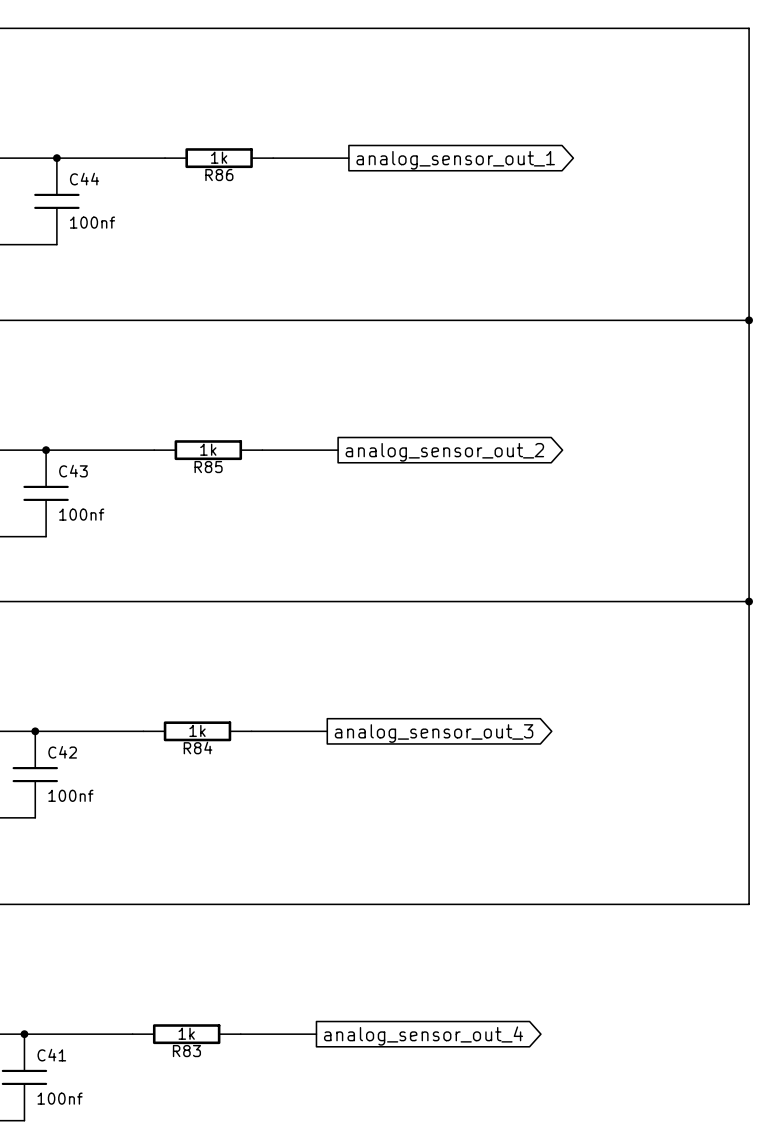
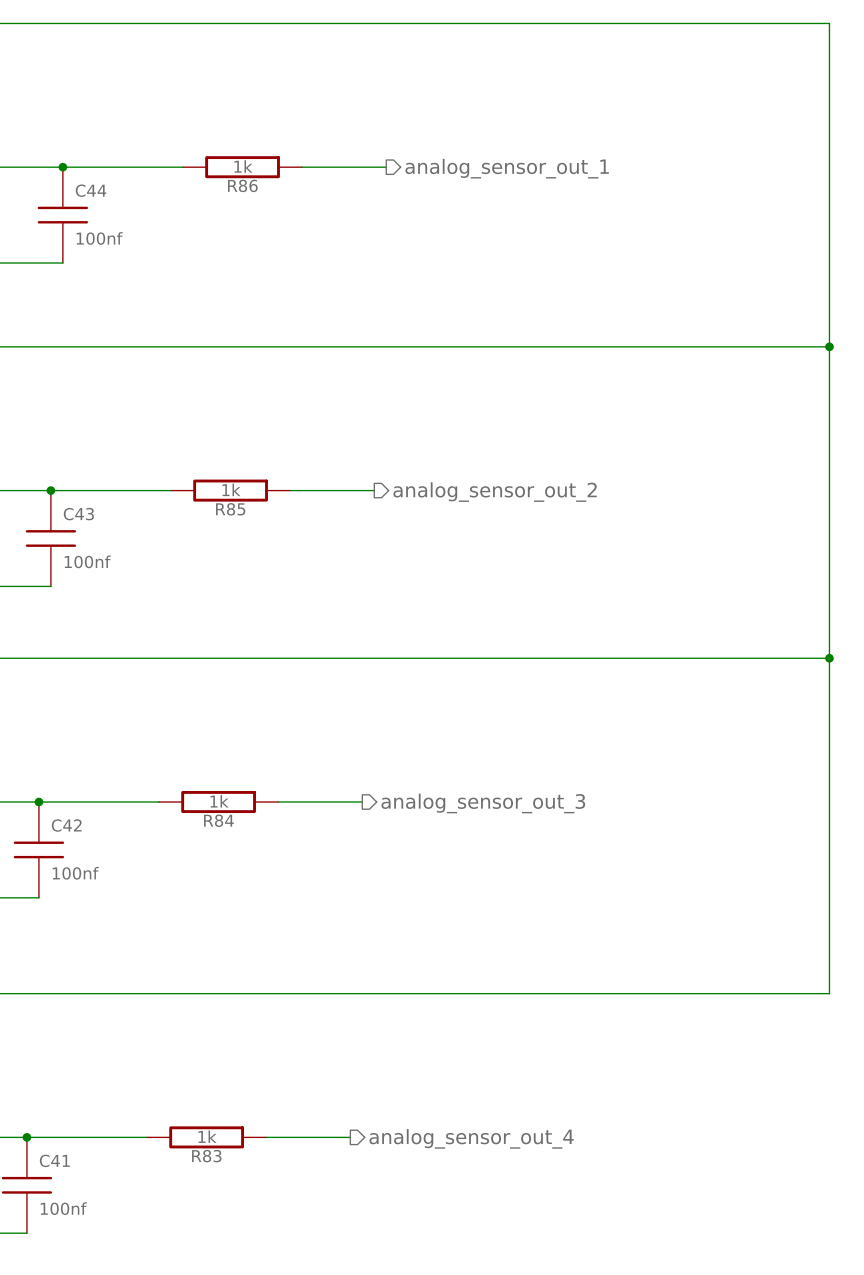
hierarchical label: none -> analog_sensor_out_1 (507, 168)
global label: analog_sensor_out_1 (455, 160) -> none
hierarchical label: none -> analog_sensor_out_2 (495, 492)
global label: analog_sensor_out_2 (444, 452) -> none
global label: analog_sensor_out_3 (434, 733) -> none
hierarchical label: none -> analog_sensor_out_3 (483, 803)
hierarchical label: none -> analog_sensor_out_4 (471, 1138)
global label: analog_sensor_out_4 (423, 1036) -> none

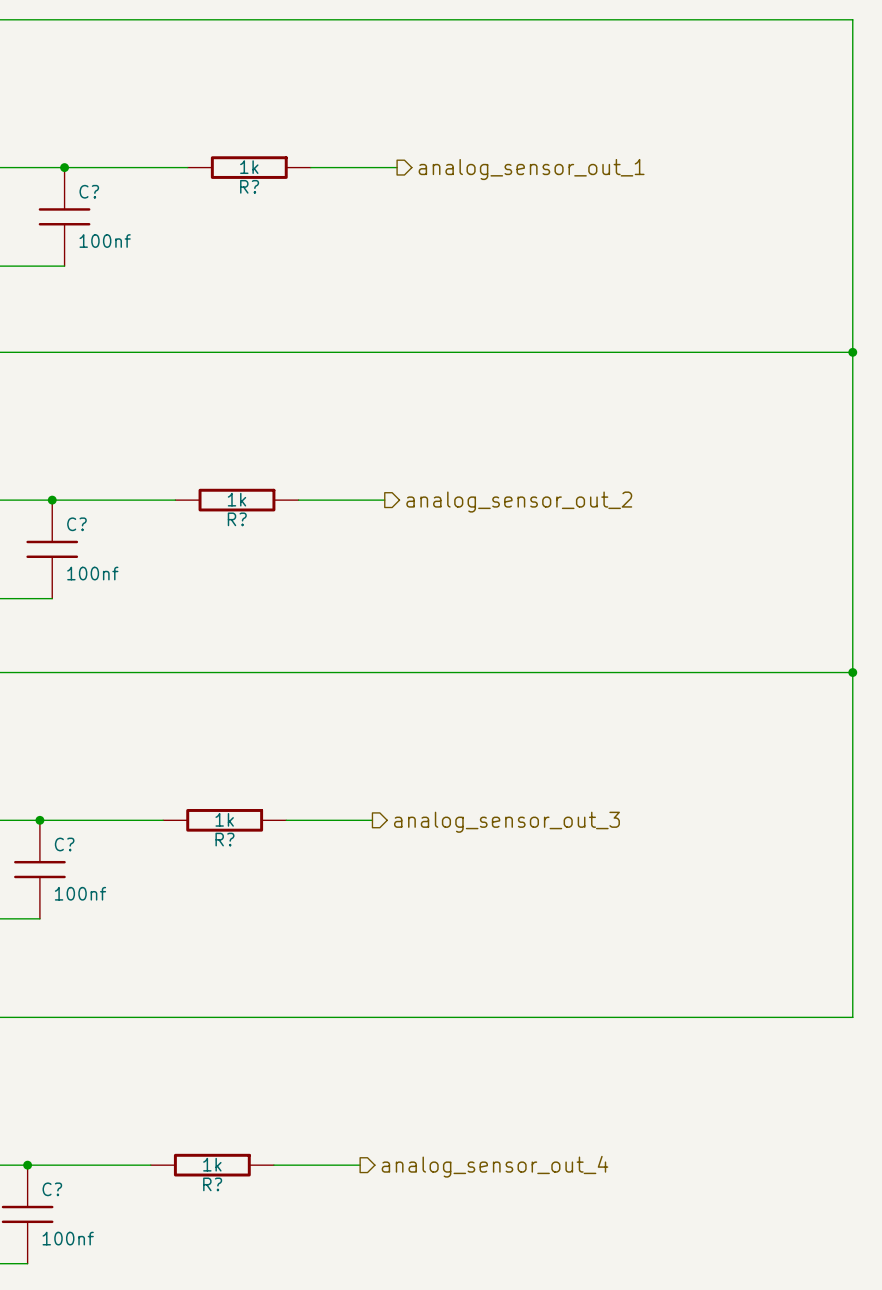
R86 name: R86 (242, 185) -> R? (249, 186)
C44 name: C44 (91, 190) -> C? (89, 191)
R85 name: R85 (230, 509) -> R? (237, 519)
C43 name: C43 (78, 514) -> C? (76, 524)
R84 name: R84 (218, 820) -> R? (224, 839)
C42 name: C42 (66, 825) -> C? (64, 844)
R83 name: R83 (206, 1156) -> R? (212, 1184)
C41 name: C41 (54, 1160) -> C? (52, 1189)

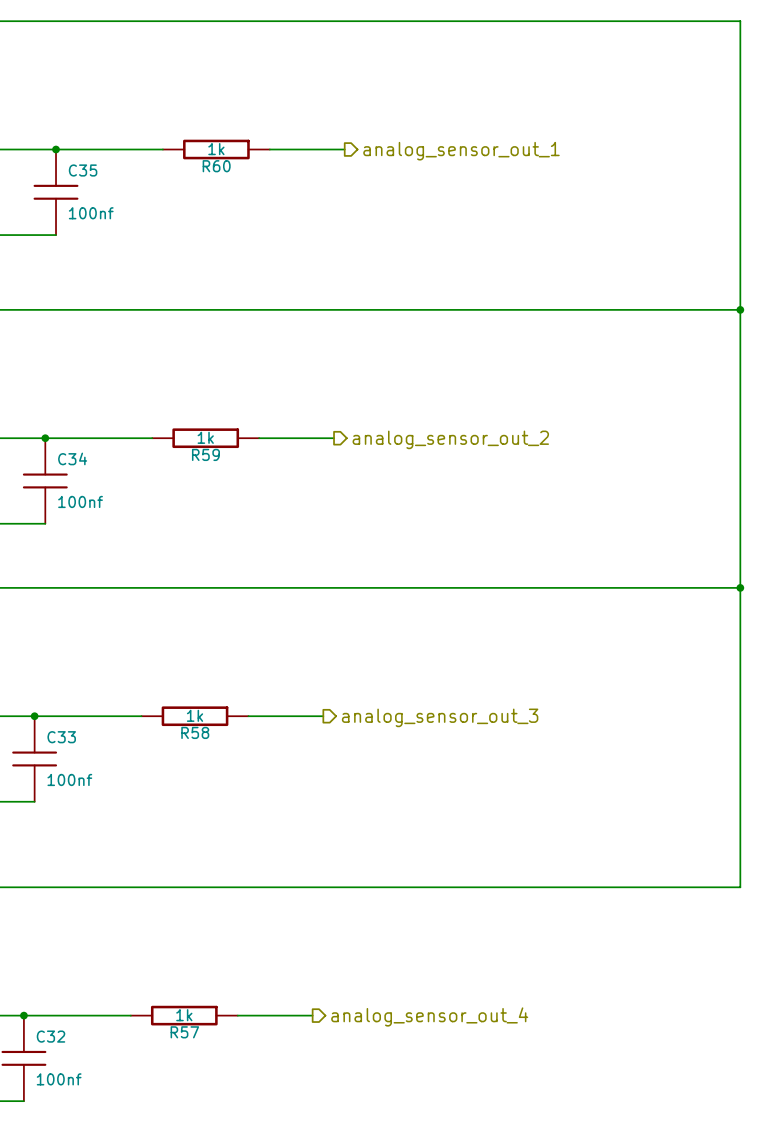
R? name: R? (249, 186) -> R60 (216, 166)
C? name: C? (89, 191) -> C35 (83, 170)
R? name: R? (237, 519) -> R59 (205, 454)
C? name: C? (76, 524) -> C34 (72, 458)
R? name: R? (224, 839) -> R58 (195, 732)
C? name: C? (64, 844) -> C33 (61, 737)
R? name: R? (212, 1184) -> R57 (184, 1032)
C? name: C? (52, 1189) -> C32 (51, 1036)

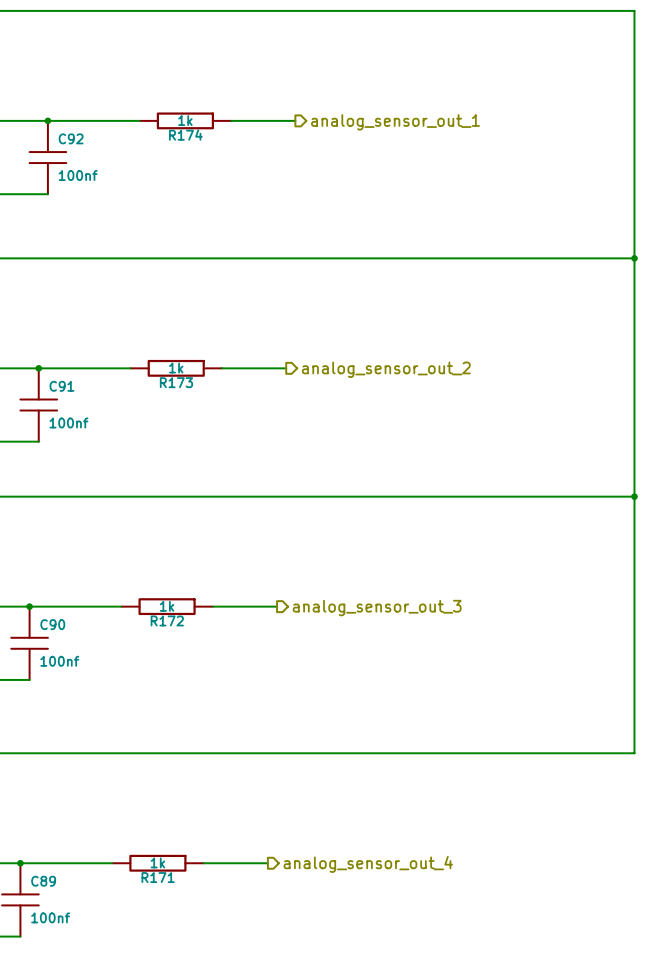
R60 name: R60 (216, 166) -> R174 (185, 134)
C35 name: C35 (83, 170) -> C92 (71, 138)
R59 name: R59 (205, 454) -> R173 (176, 382)
C34 name: C34 (72, 458) -> C91 (61, 386)
R58 name: R58 (195, 732) -> R172 (167, 620)
C33 name: C33 (61, 737) -> C90 (52, 624)
R57 name: R57 (184, 1032) -> R171 (158, 877)
C32 name: C32 (51, 1036) -> C89 (43, 881)

